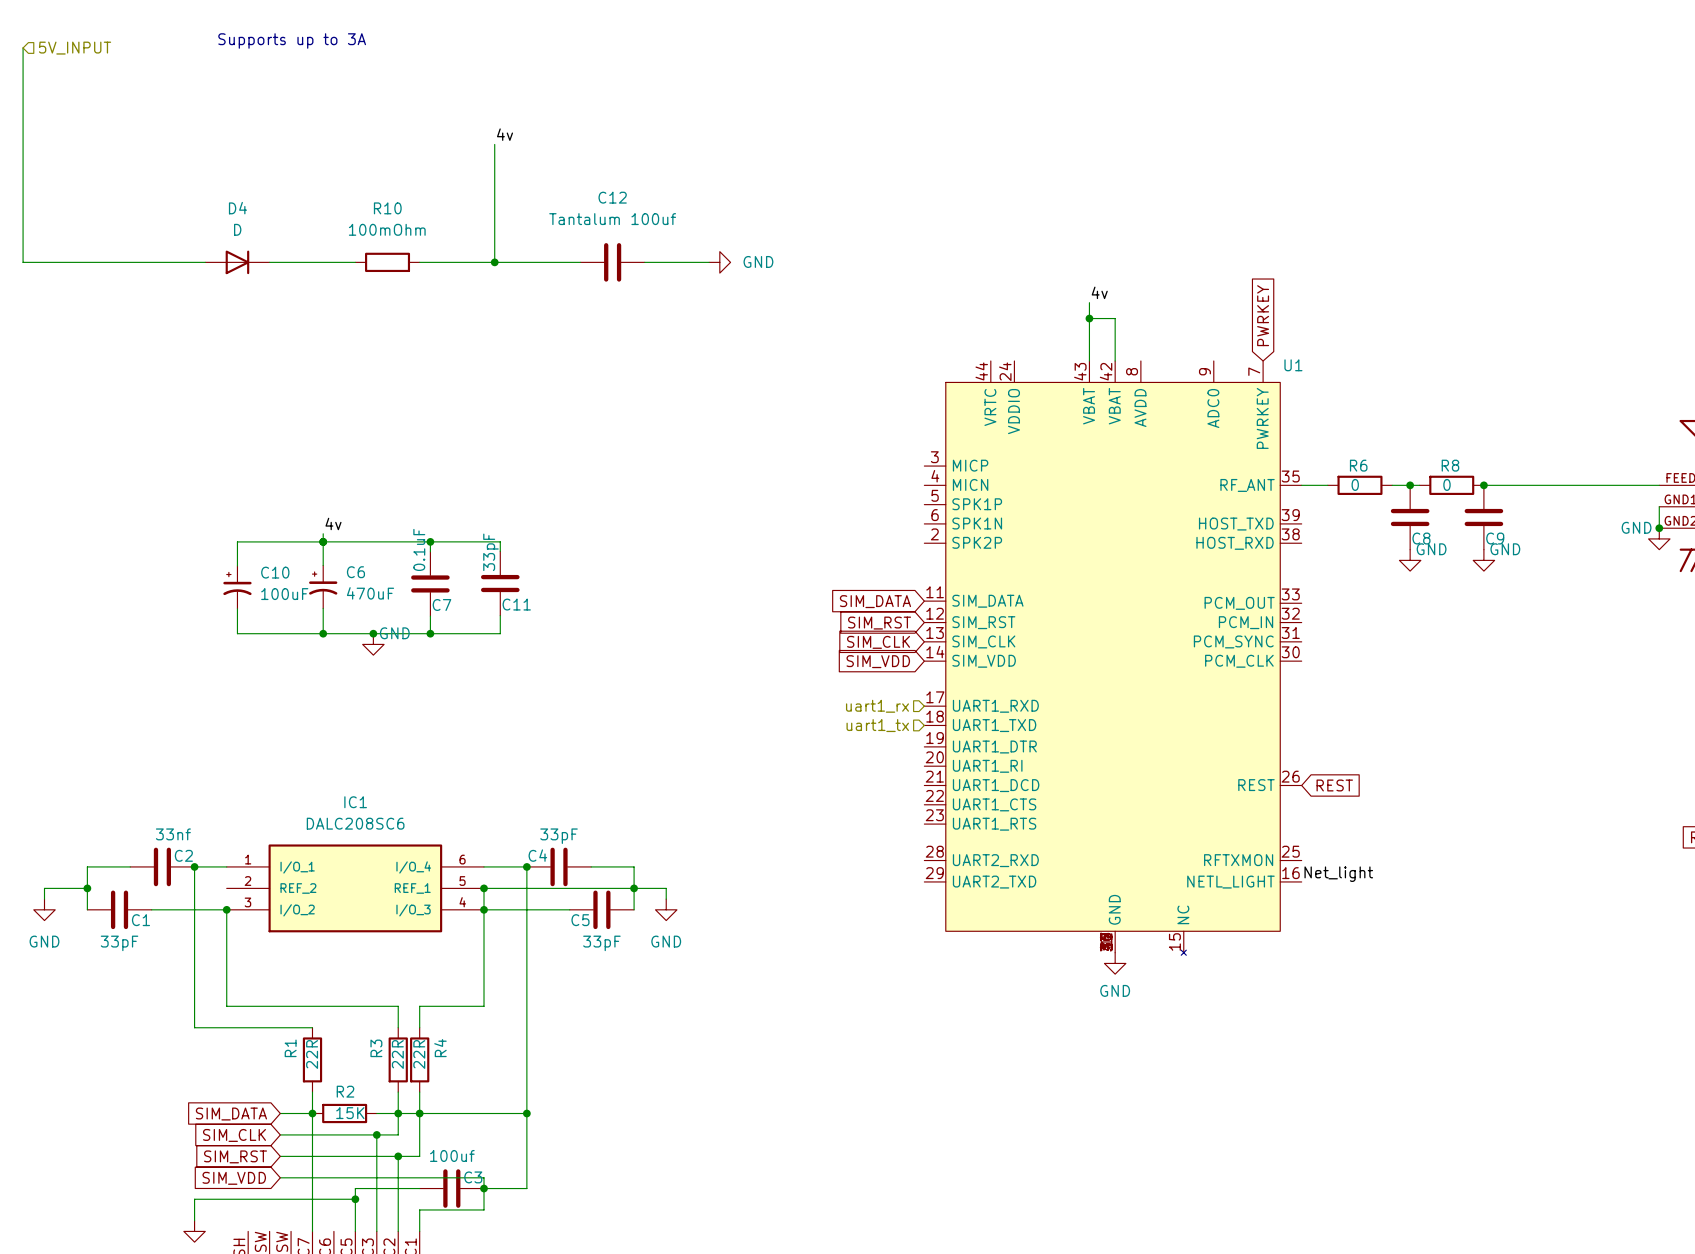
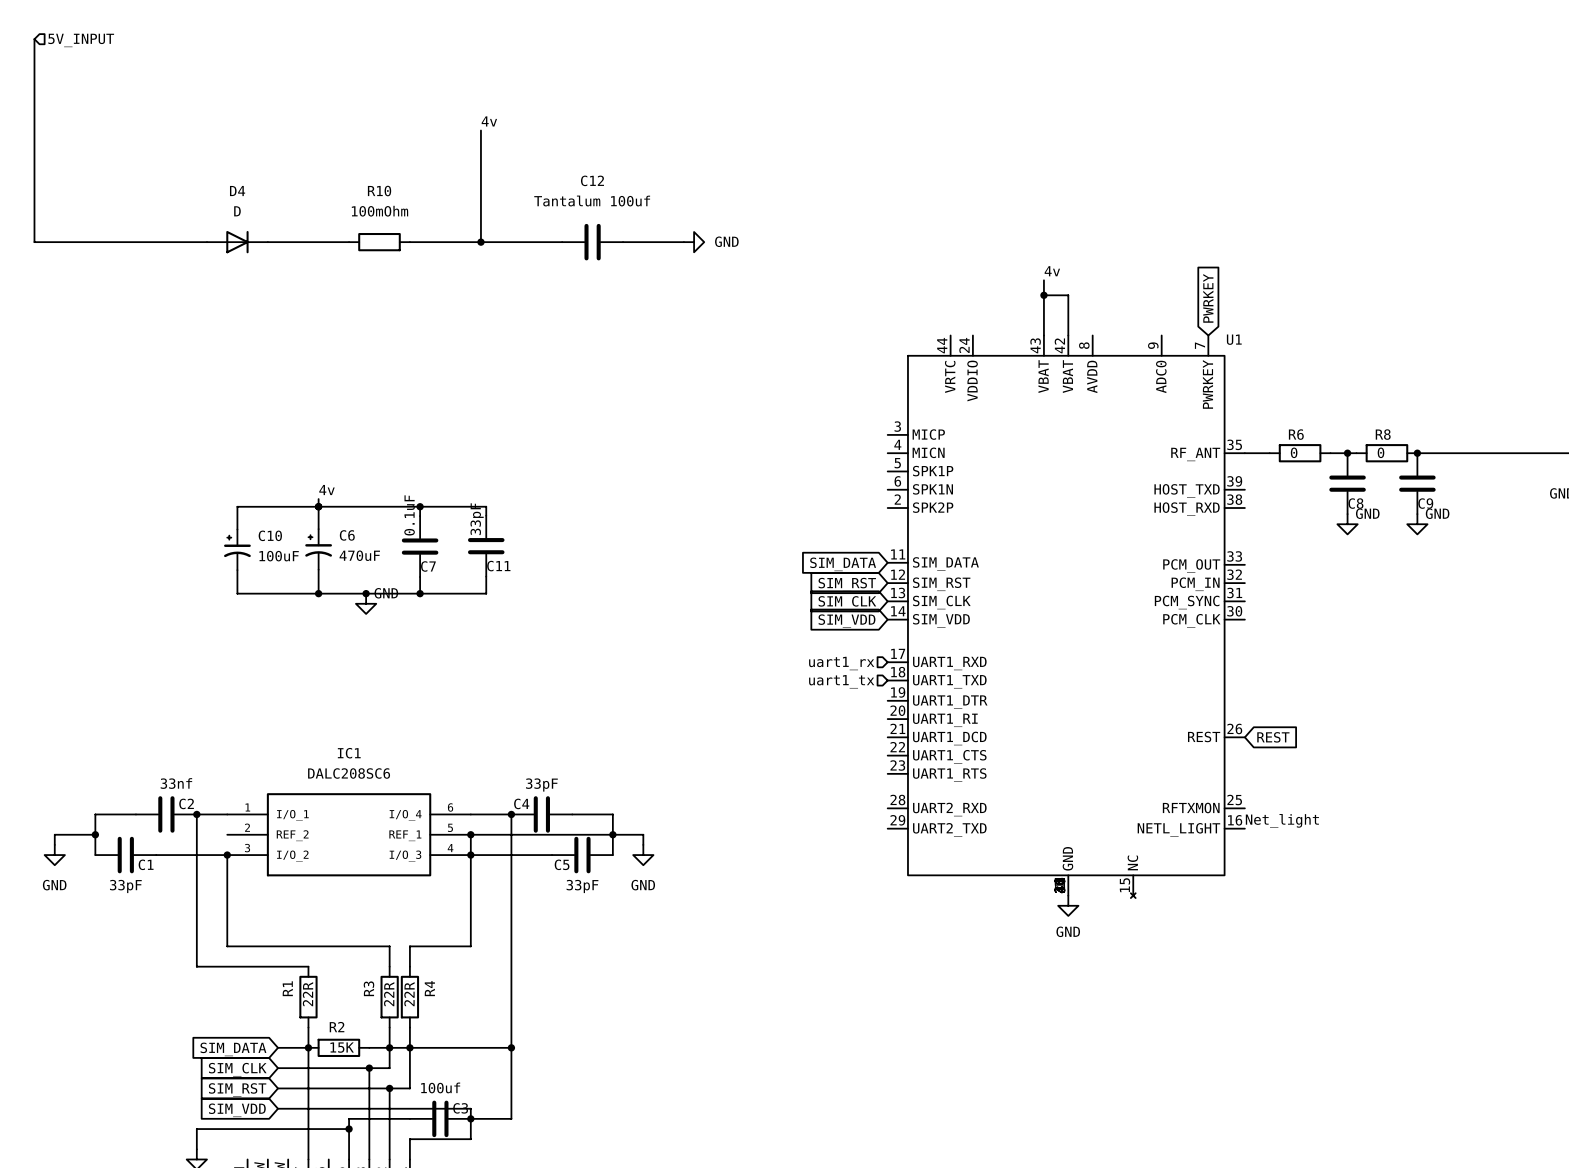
text: Supports up to 3A (292, 40) -> none

